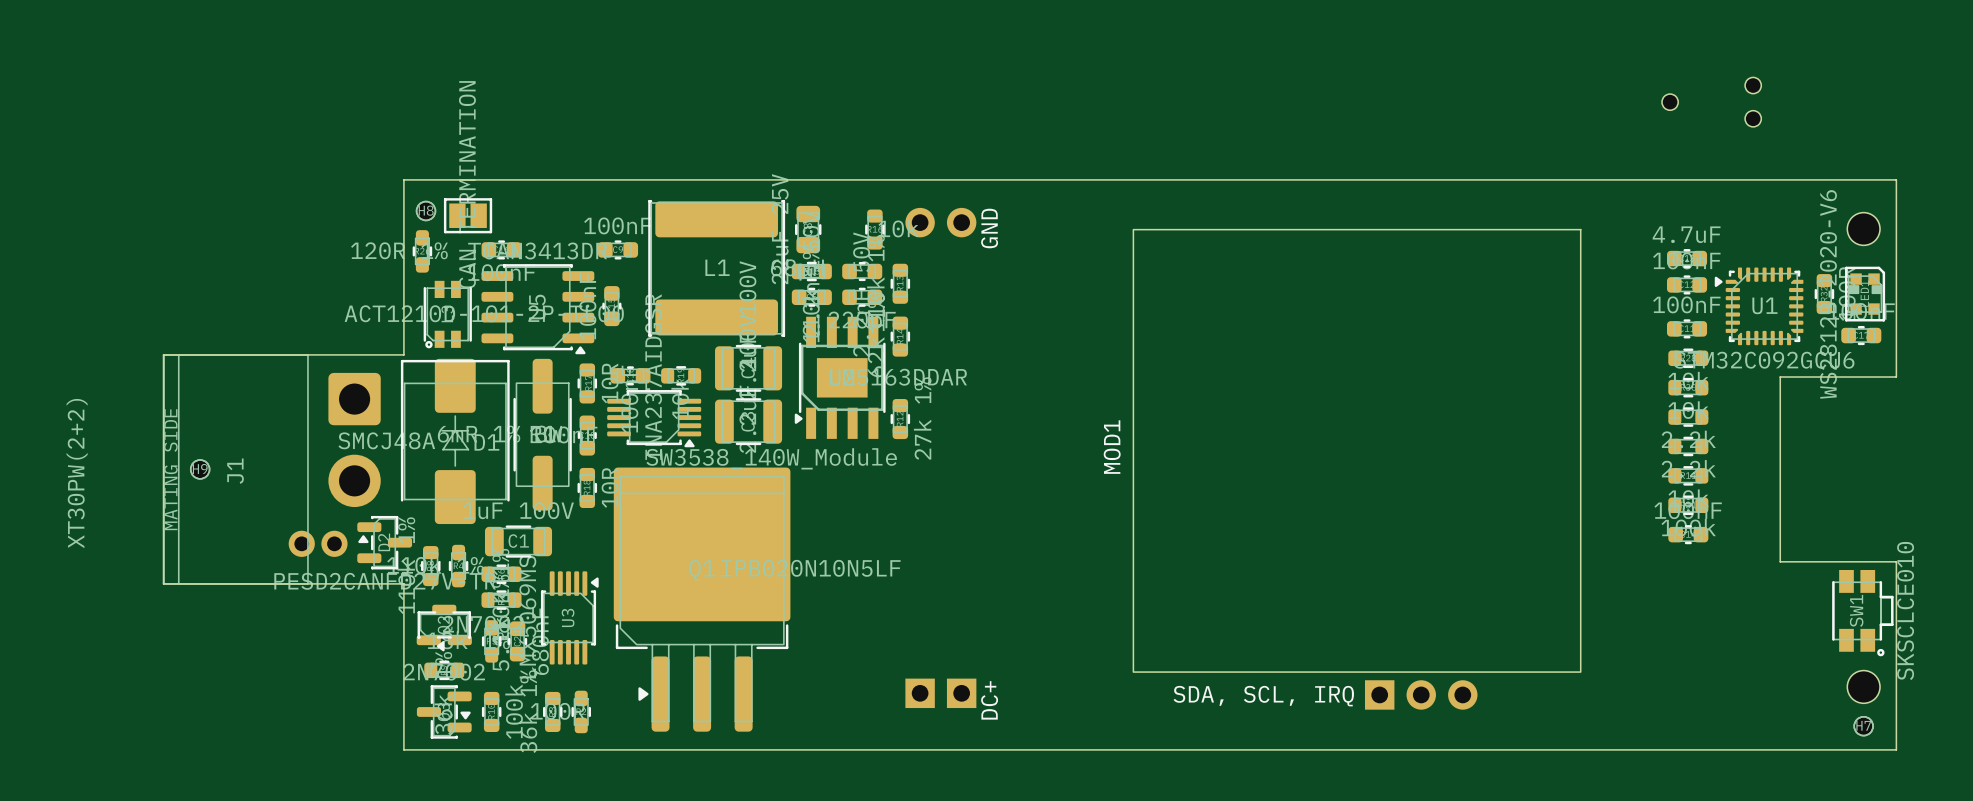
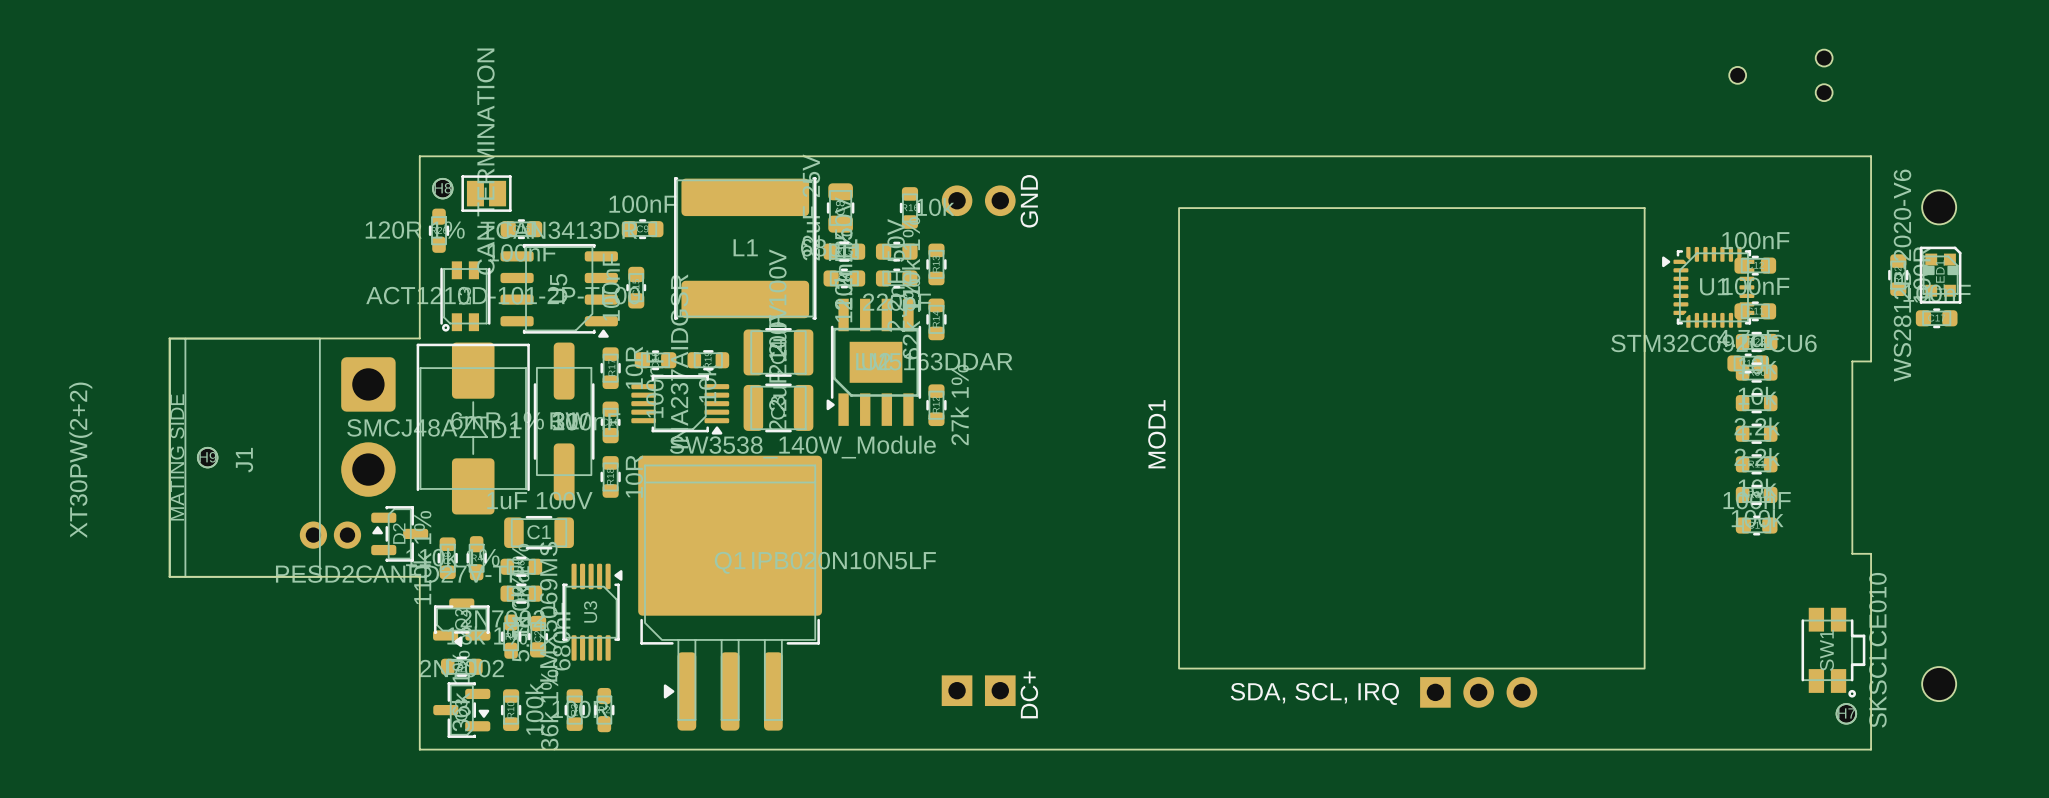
board edge: (1798, 179) (1896, 179) (1896, 377) -> (1871, 156) (1871, 361)
MOD1 footprint: [905, 207, 1897, 710] -> [941, 185, 1957, 708]
part position: (1687, 258) -> (1748, 363)
U1 position: (1759, 306) -> (1708, 287)
board edge: (1896, 561) (1896, 749) (1798, 749) -> (1871, 553) (1871, 749)
SW1 position: (1862, 613) -> (1833, 652)
H7 position: (1863, 726) -> (1846, 713)

